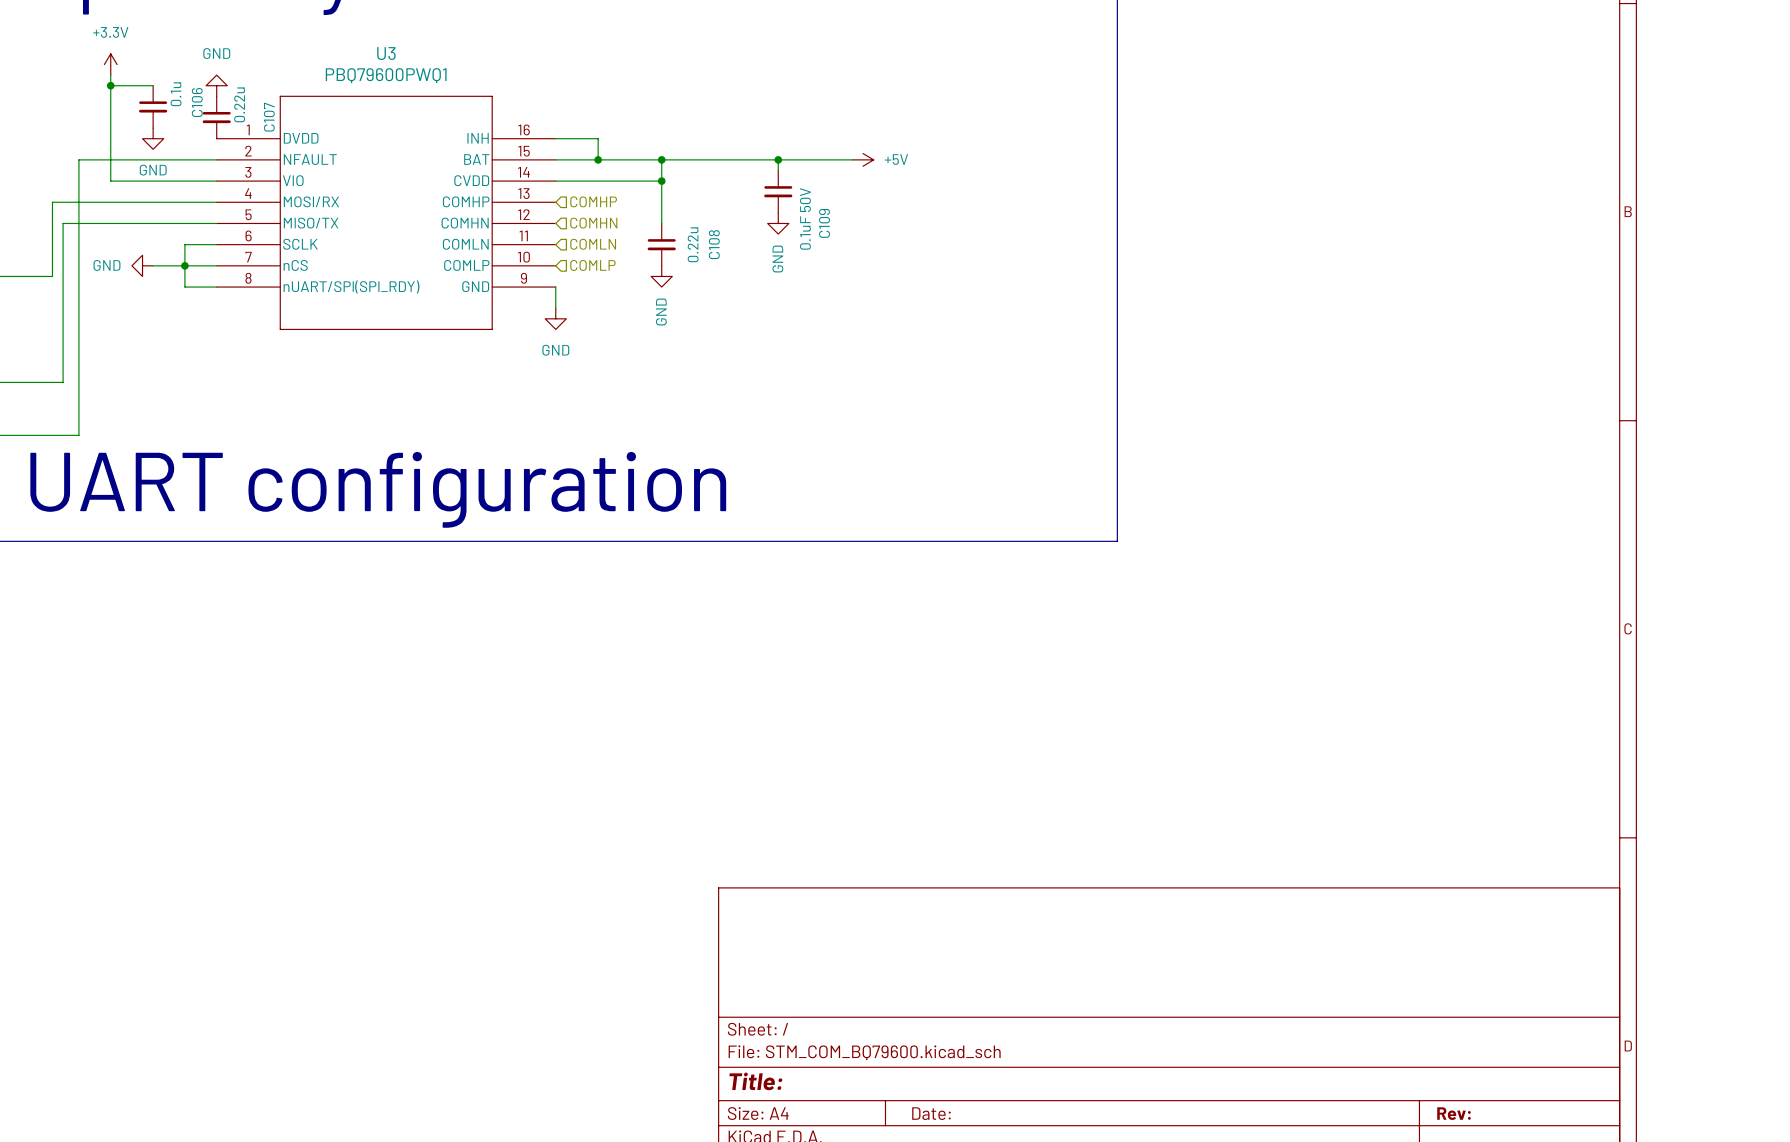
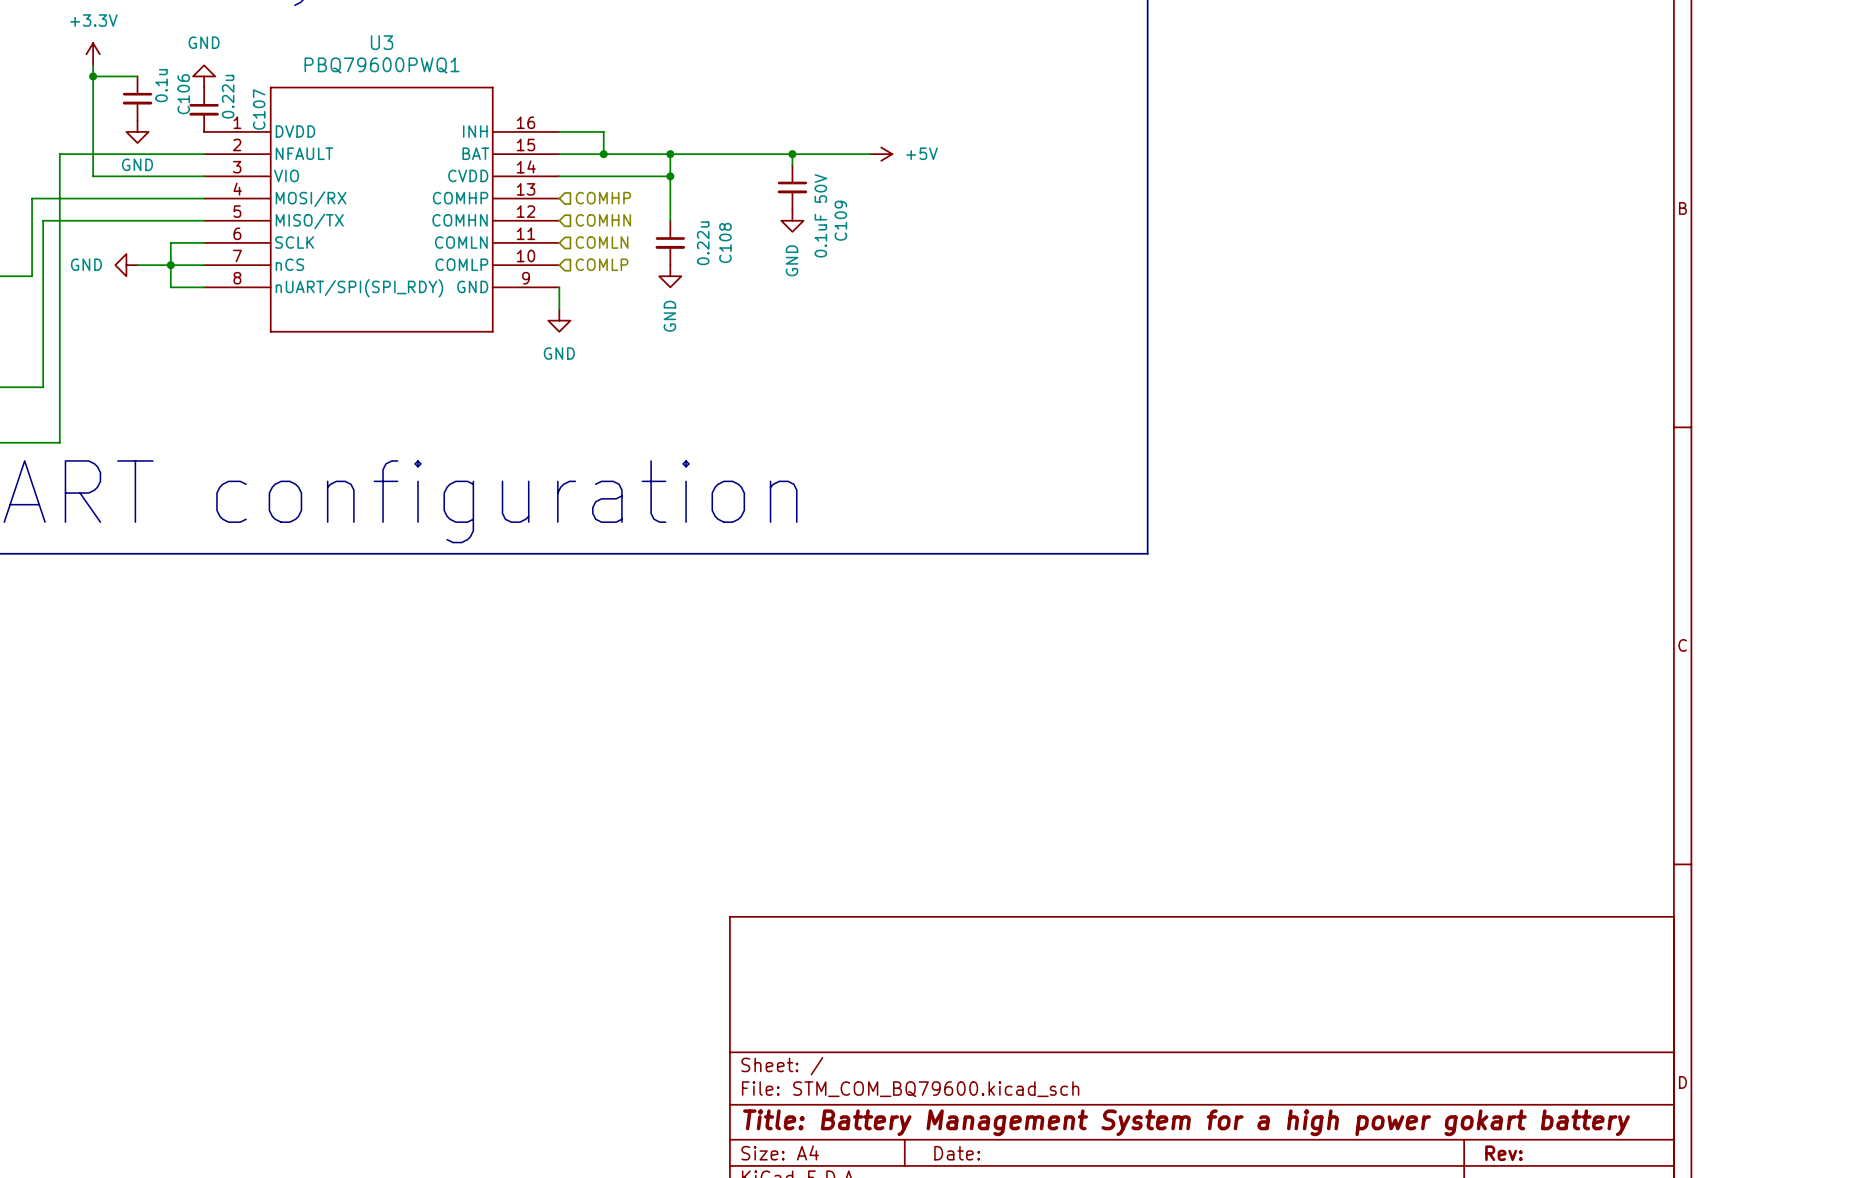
title block: Title: (755, 1081) -> Title: Battery Management System for a high power gokart battery (1186, 1122)

